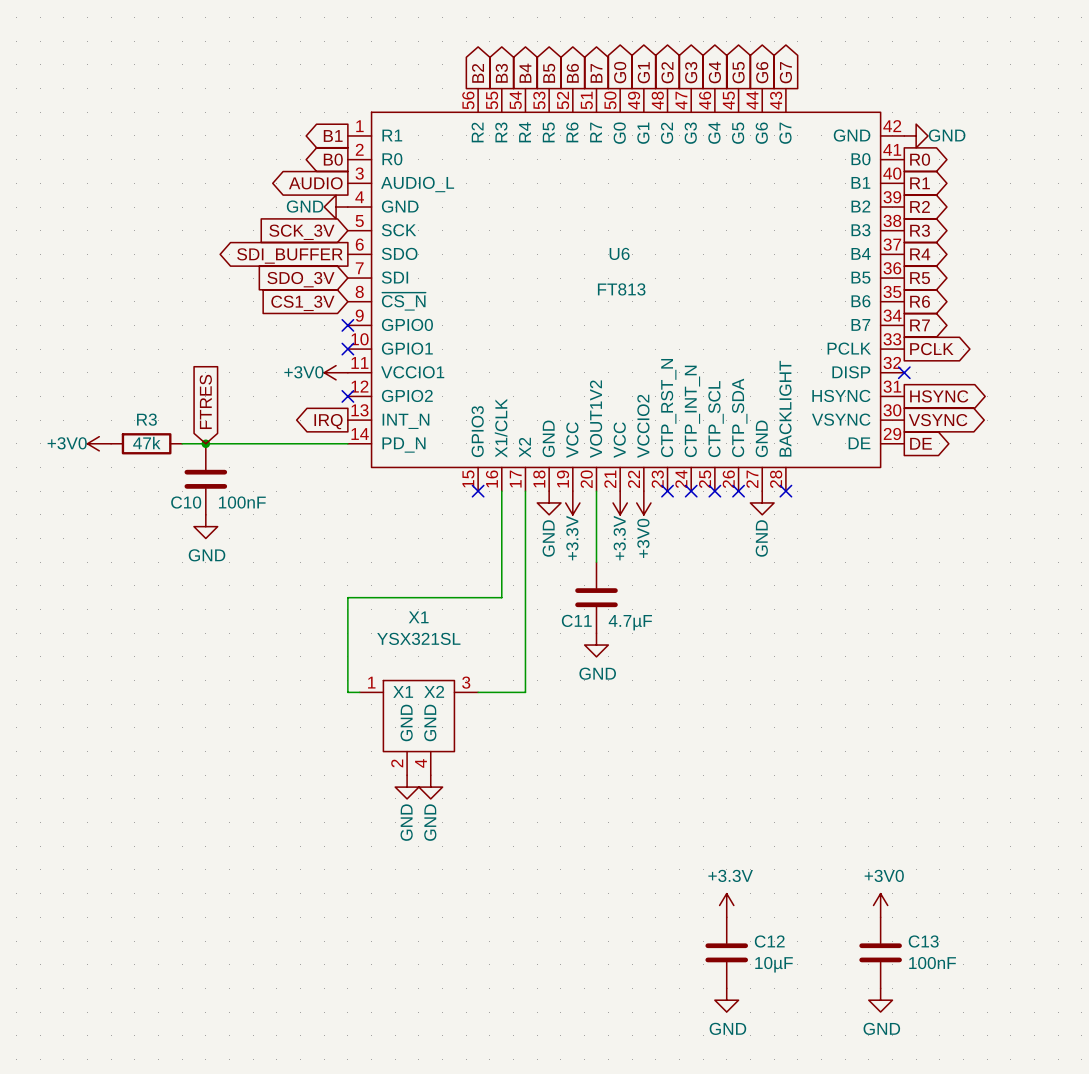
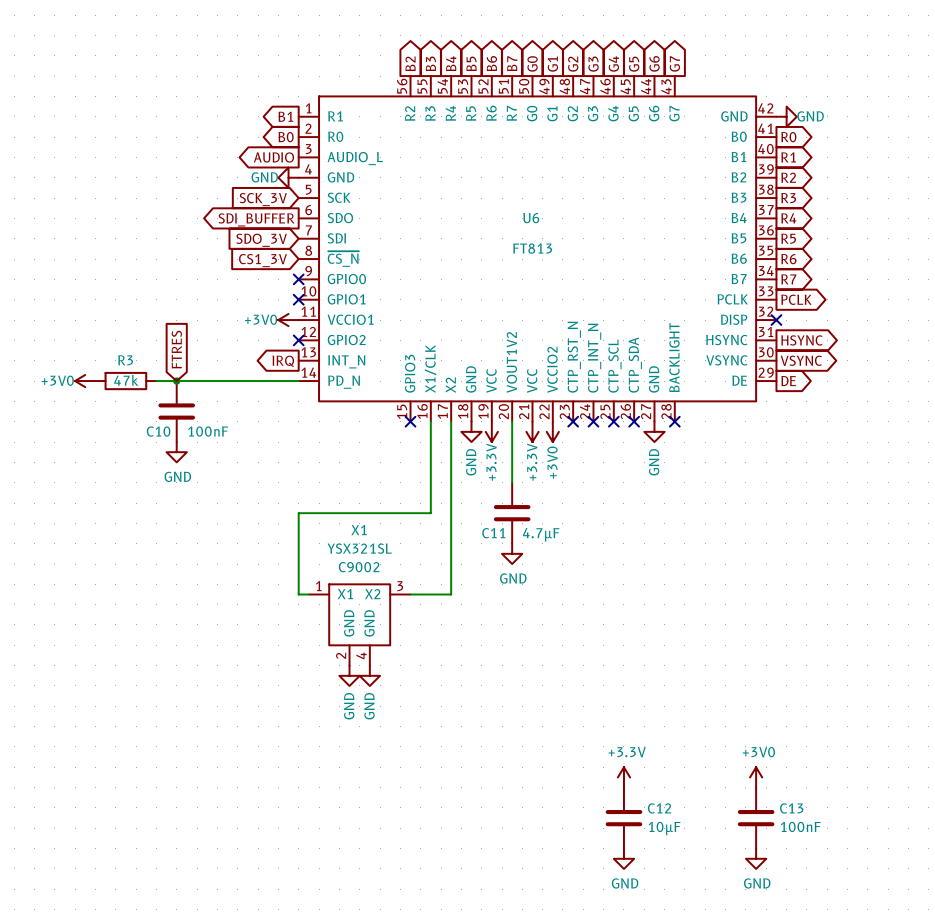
X1 text: none -> C9002 (359, 567)

